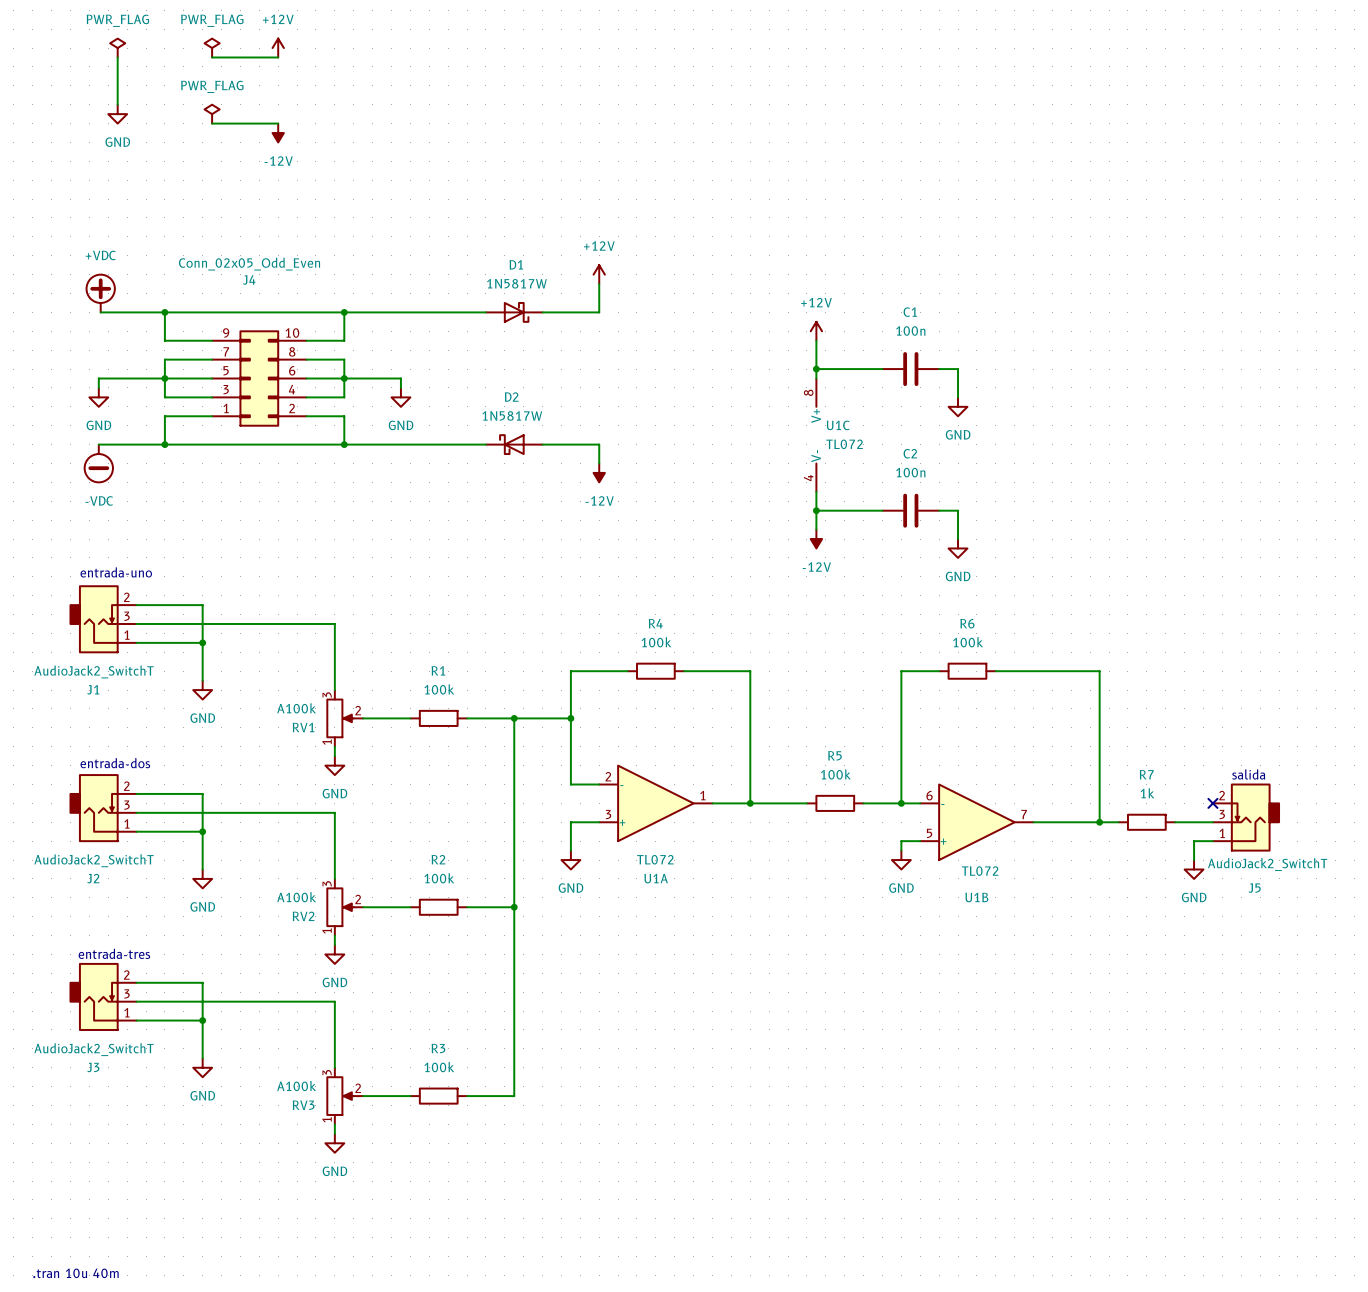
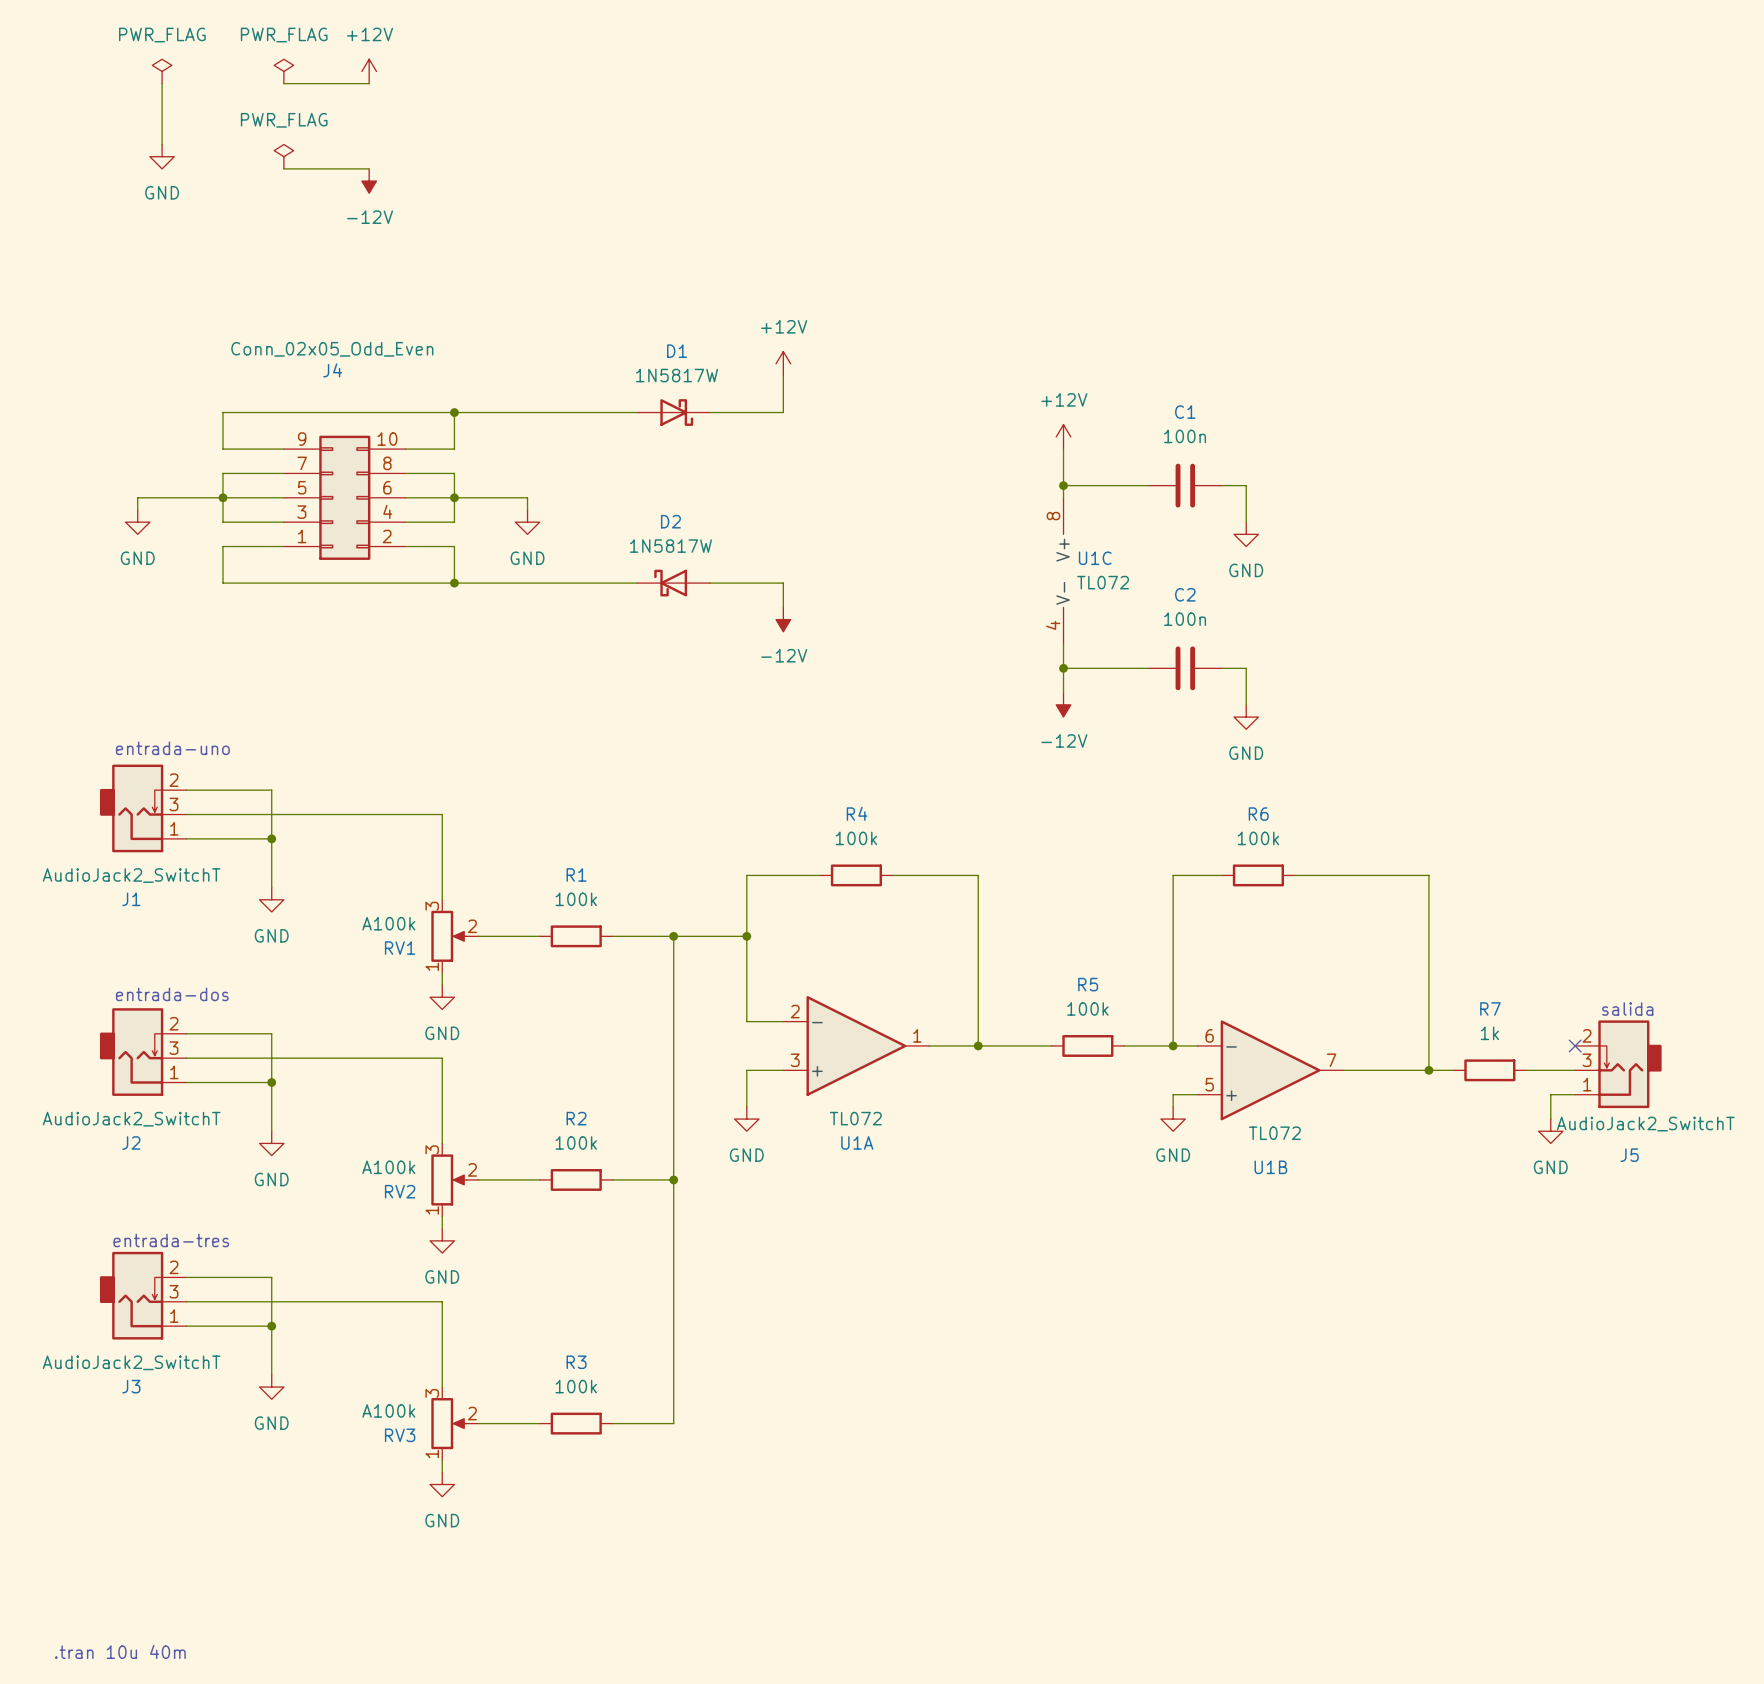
power symbol: +VDC (100, 293) -> none
wire: (100, 312) (164, 312) -> none
junction: (164, 312) -> none
wire: (98, 444) (164, 444) -> none
junction: (164, 444) -> none
power symbol: -VDC (98, 463) -> none

